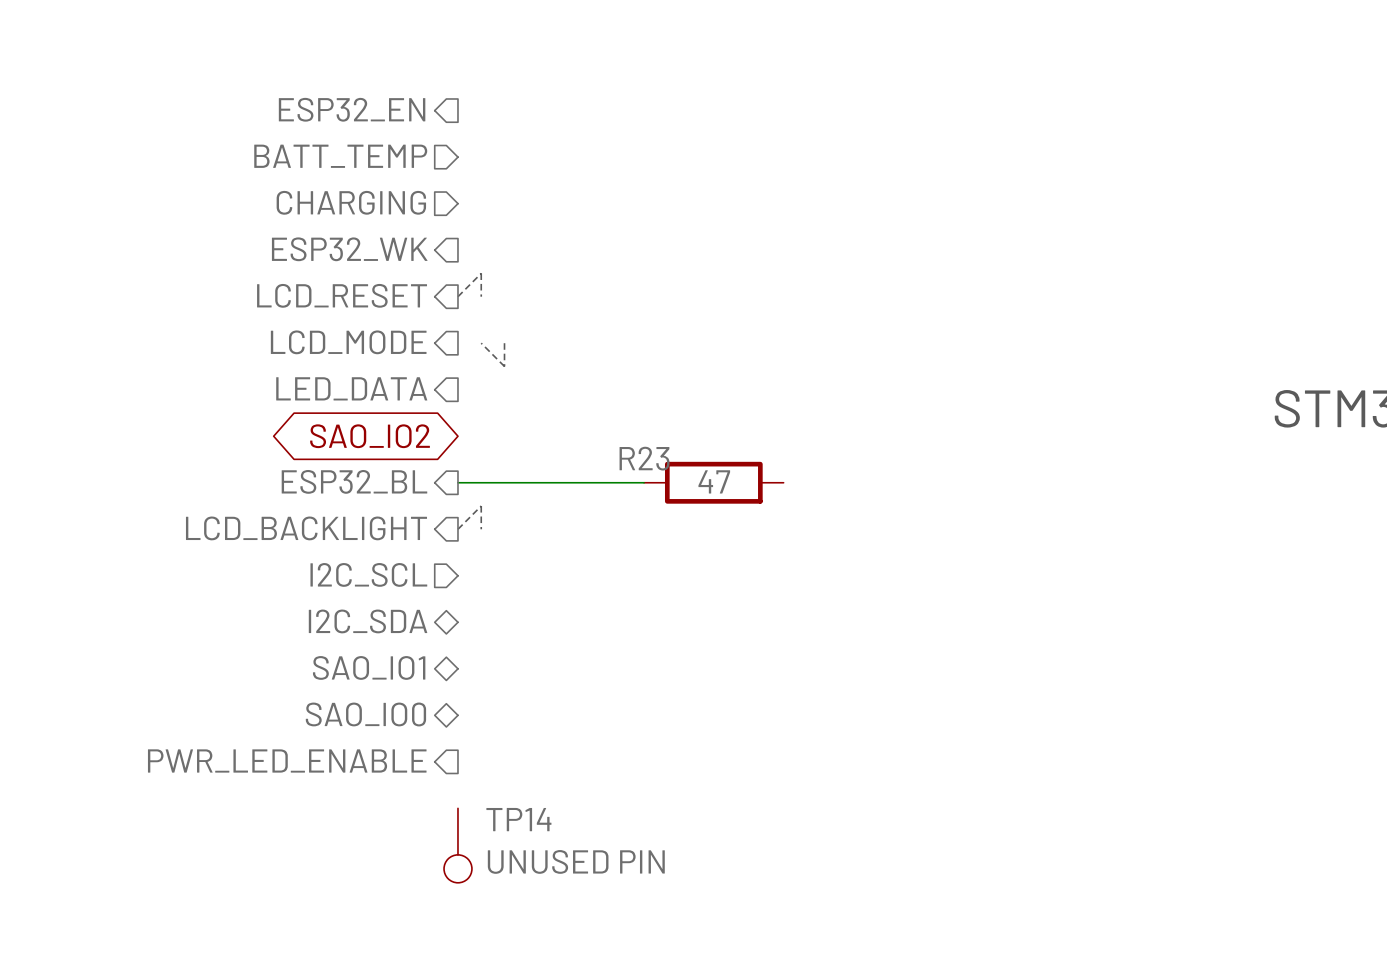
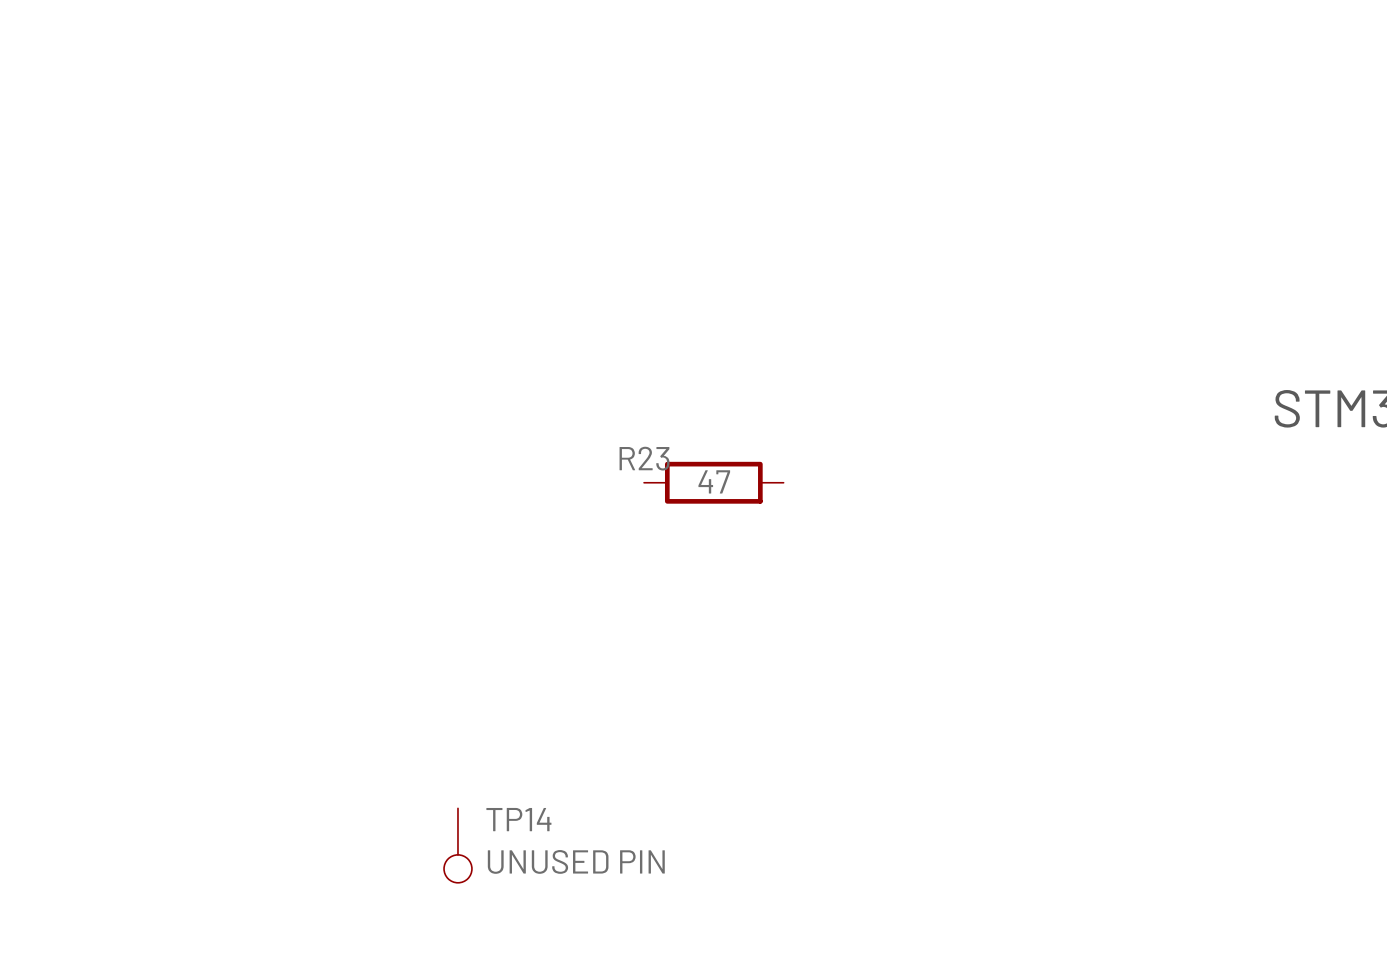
hierarchical label: ESP32_EN (352, 109) -> none
hierarchical label: BATT_TEMP (340, 156) -> none
hierarchical label: CHARGING (351, 202) -> none
hierarchical label: ESP32_WK (349, 249) -> none
hierarchical label: LCD_RESET (342, 295) -> none
line: (457, 296) (481, 273) (481, 296) -> none
hierarchical label: LCD_MODE (348, 342) -> none
line: (481, 343) (504, 366) (504, 343) -> none
hierarchical label: LED_DATA (351, 388) -> none
global label: SAO_IO2 (370, 436) -> none
hierarchical label: ESP32_BL (354, 481) -> none
wire: (457, 482) (644, 482) -> none
hierarchical label: LCD_BACKLIGHT (306, 528) -> none
line: (457, 529) (481, 506) (481, 529) -> none
hierarchical label: I2C_SCL (368, 574) -> none
hierarchical label: I2C_SDA (368, 621) -> none
hierarchical label: SAO_IO1 (369, 667) -> none
hierarchical label: SAO_IO0 (365, 714) -> none
hierarchical label: PWR_LED_ENABLE (287, 760) -> none

